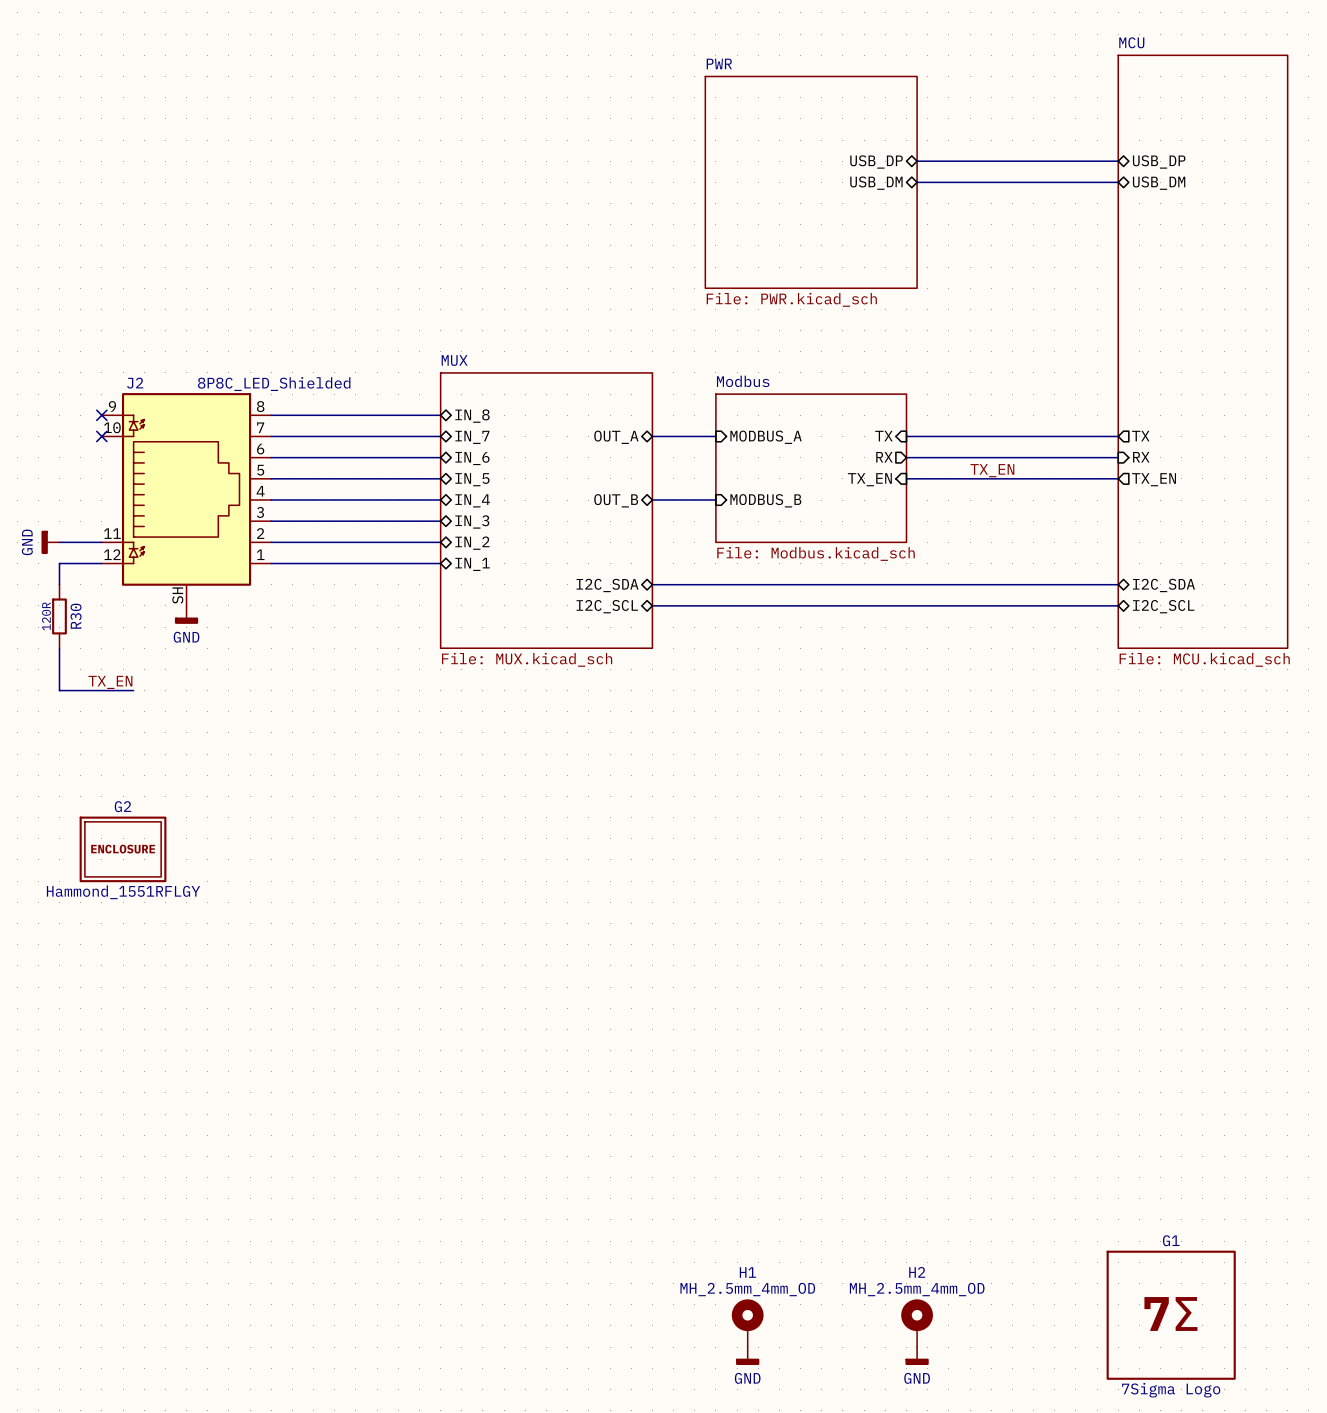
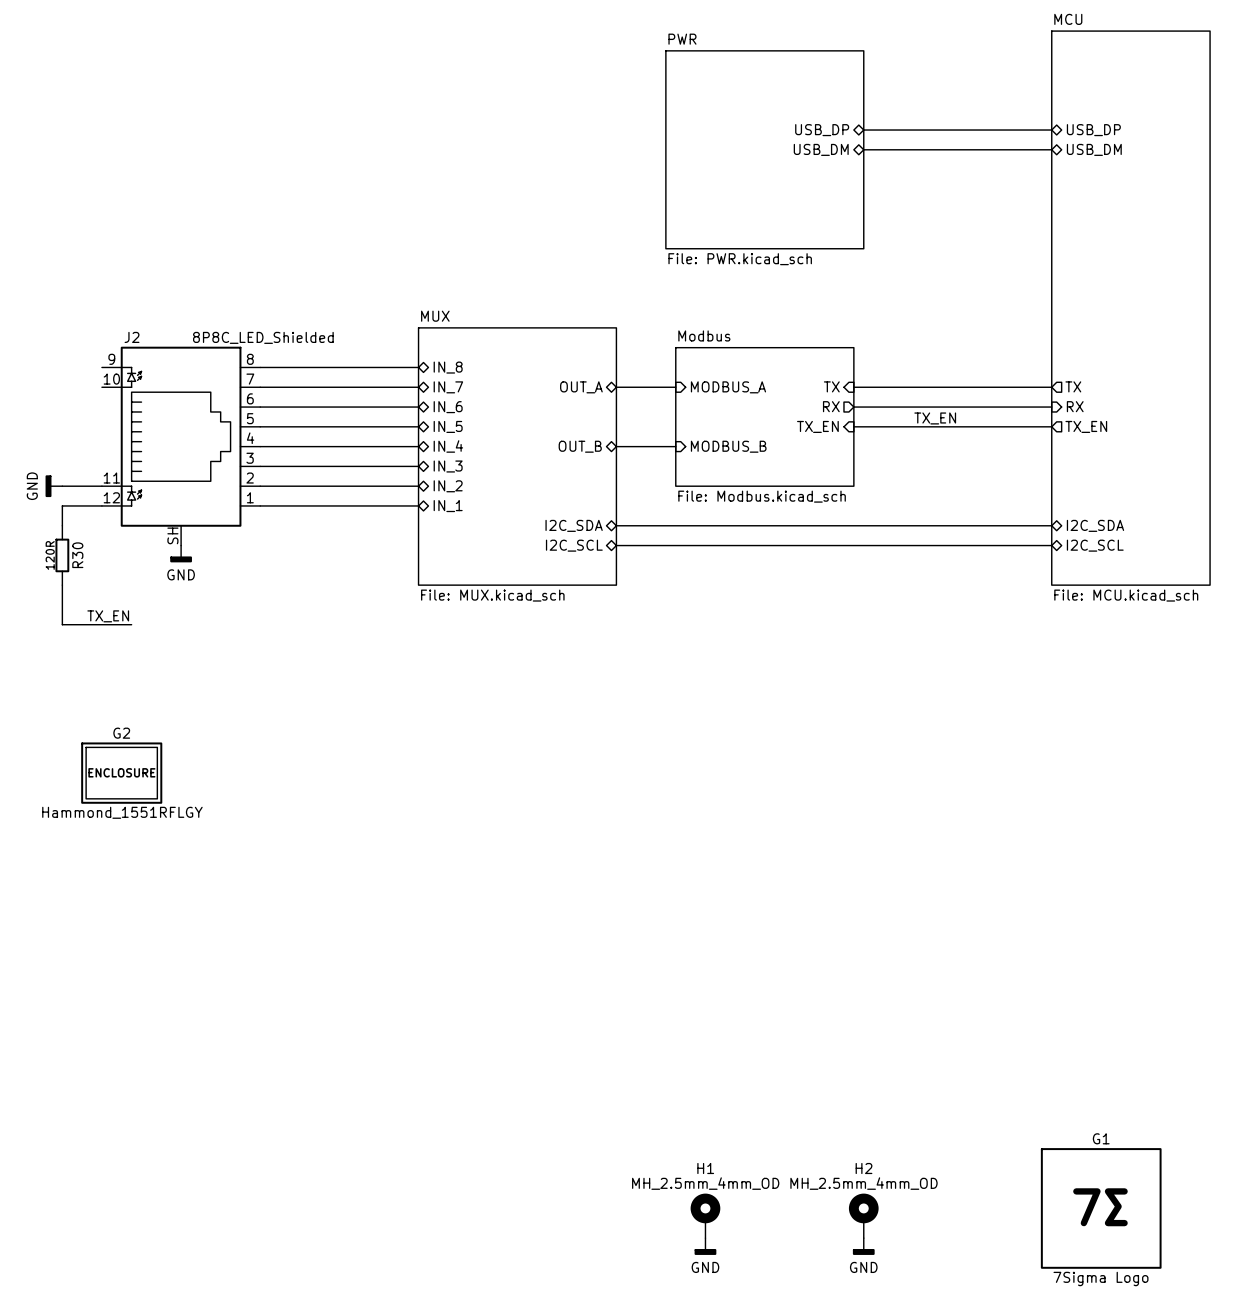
no-connect mark: (101, 415) -> none
no-connect mark: (101, 436) -> none

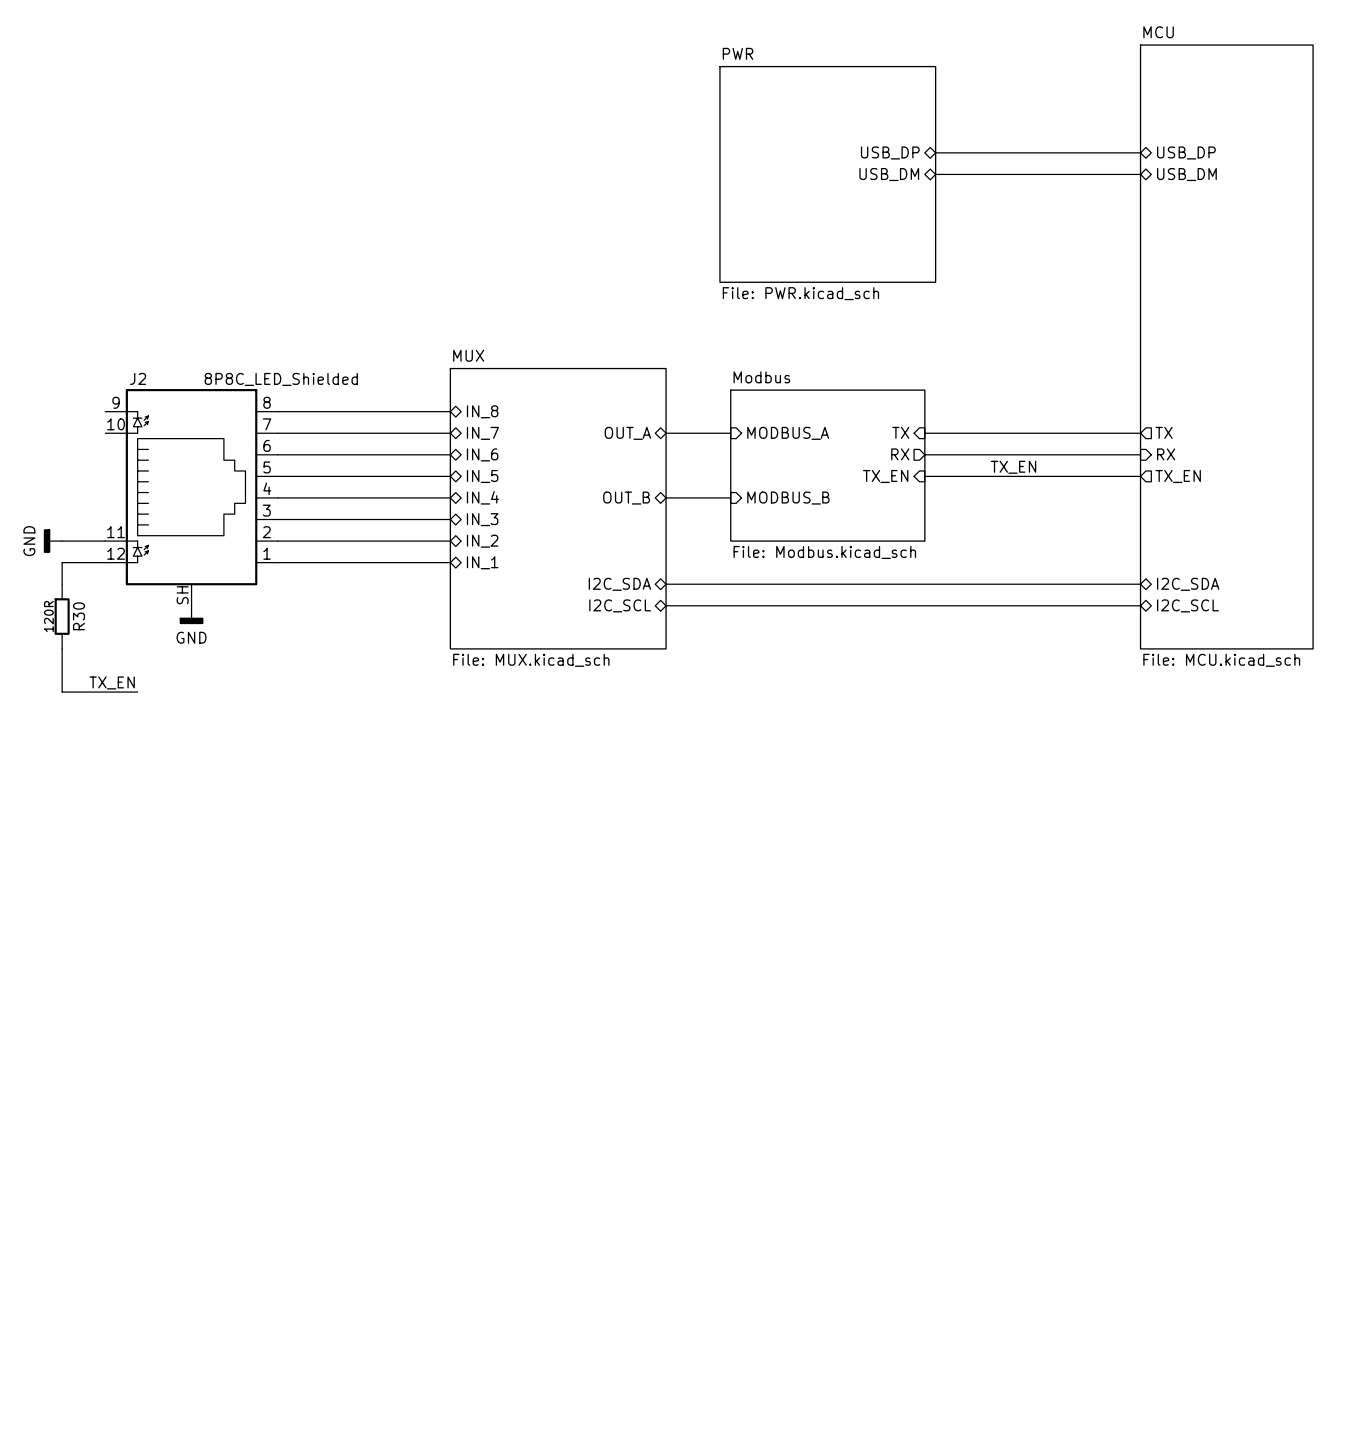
G2: Hammond_1551RFLGY (121, 773) -> none
G1: 7Sigma Logo (1101, 1208) -> none
H1: MH_2.5mm_4mm_OD (705, 1215) -> none
H2: MH_2.5mm_4mm_OD (863, 1215) -> none
power symbol: GND (705, 1246) -> none
power symbol: GND (863, 1246) -> none

